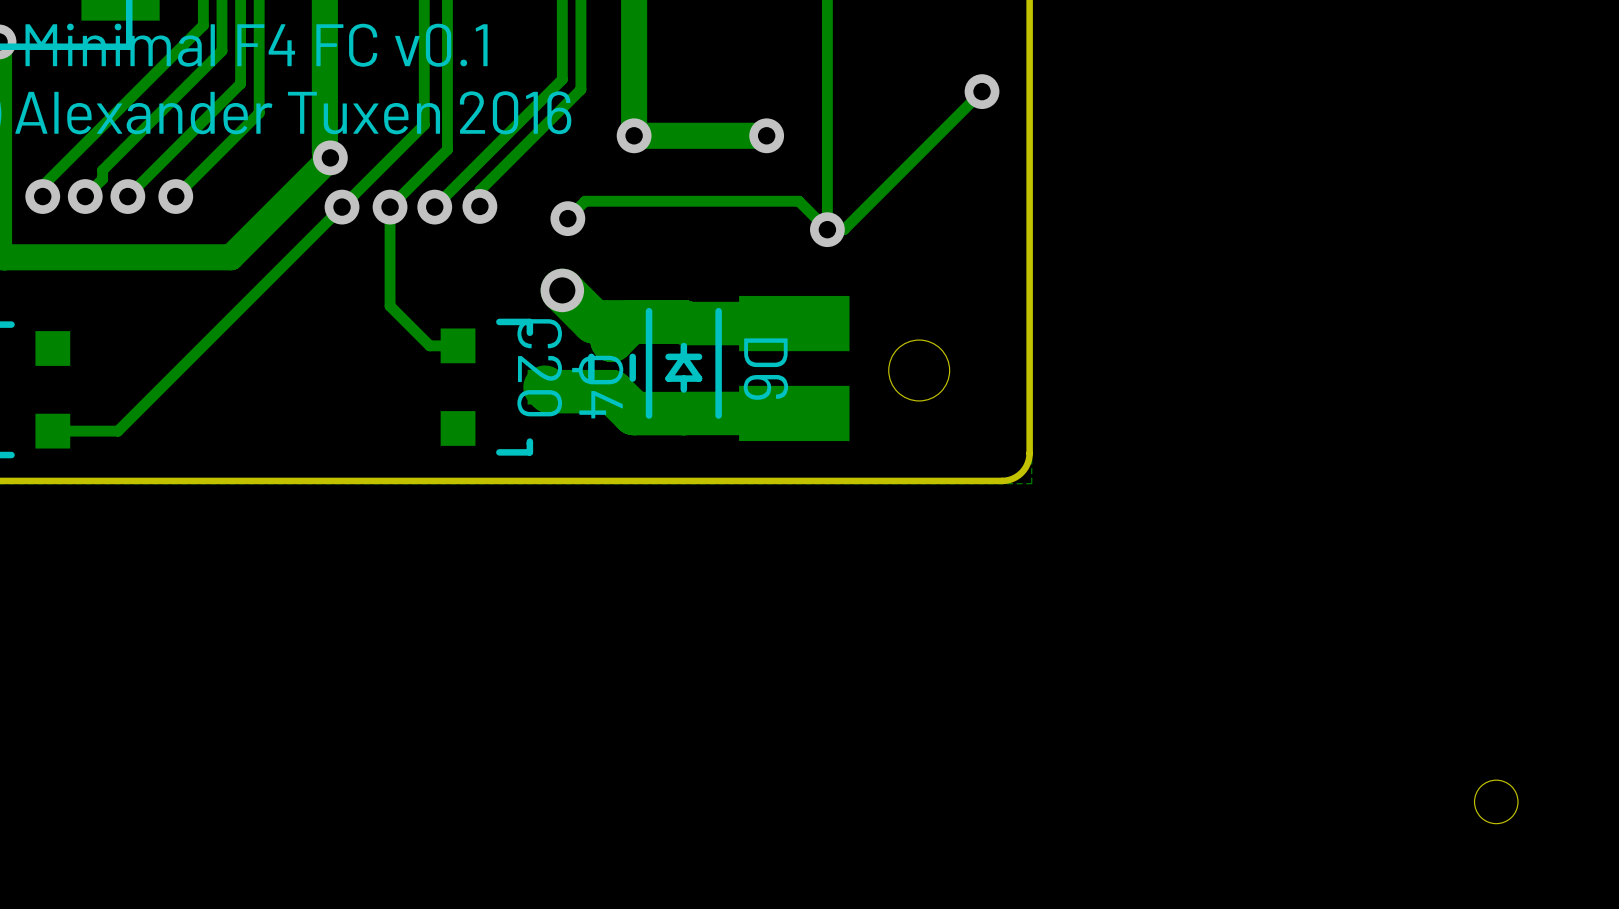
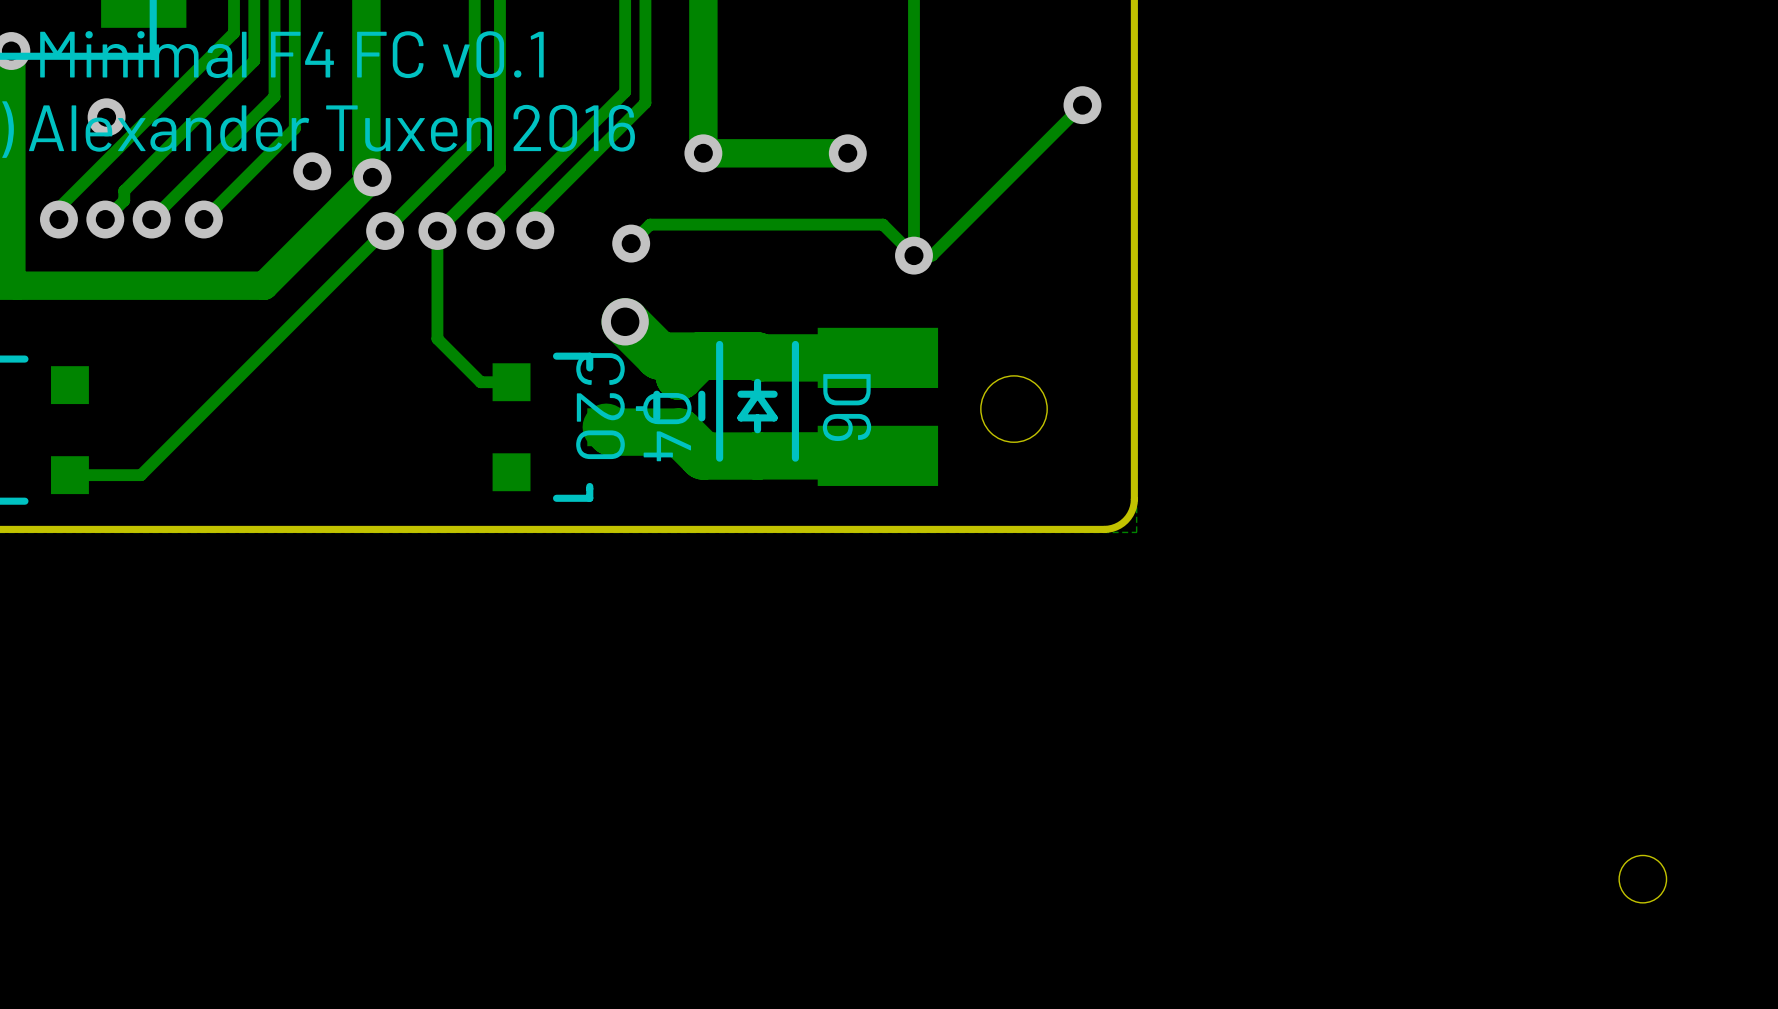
via: none -> (106, 117)
via: none -> (312, 171)

